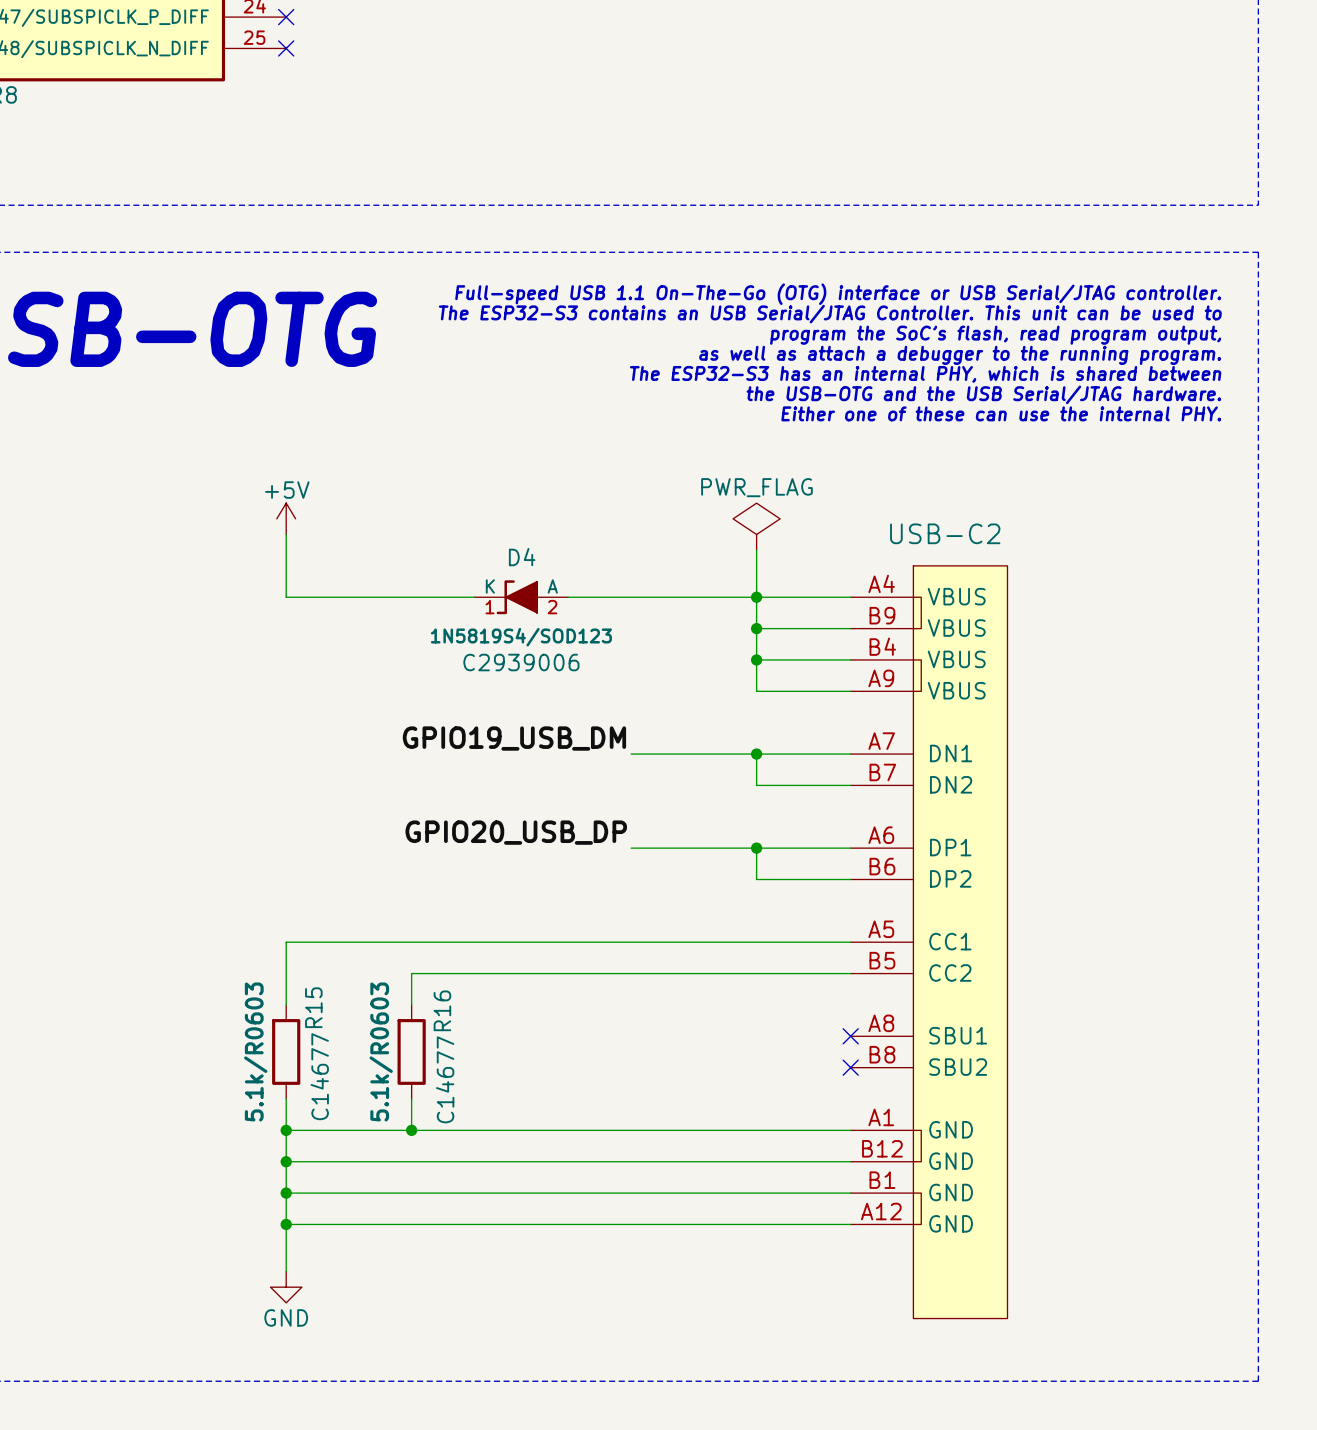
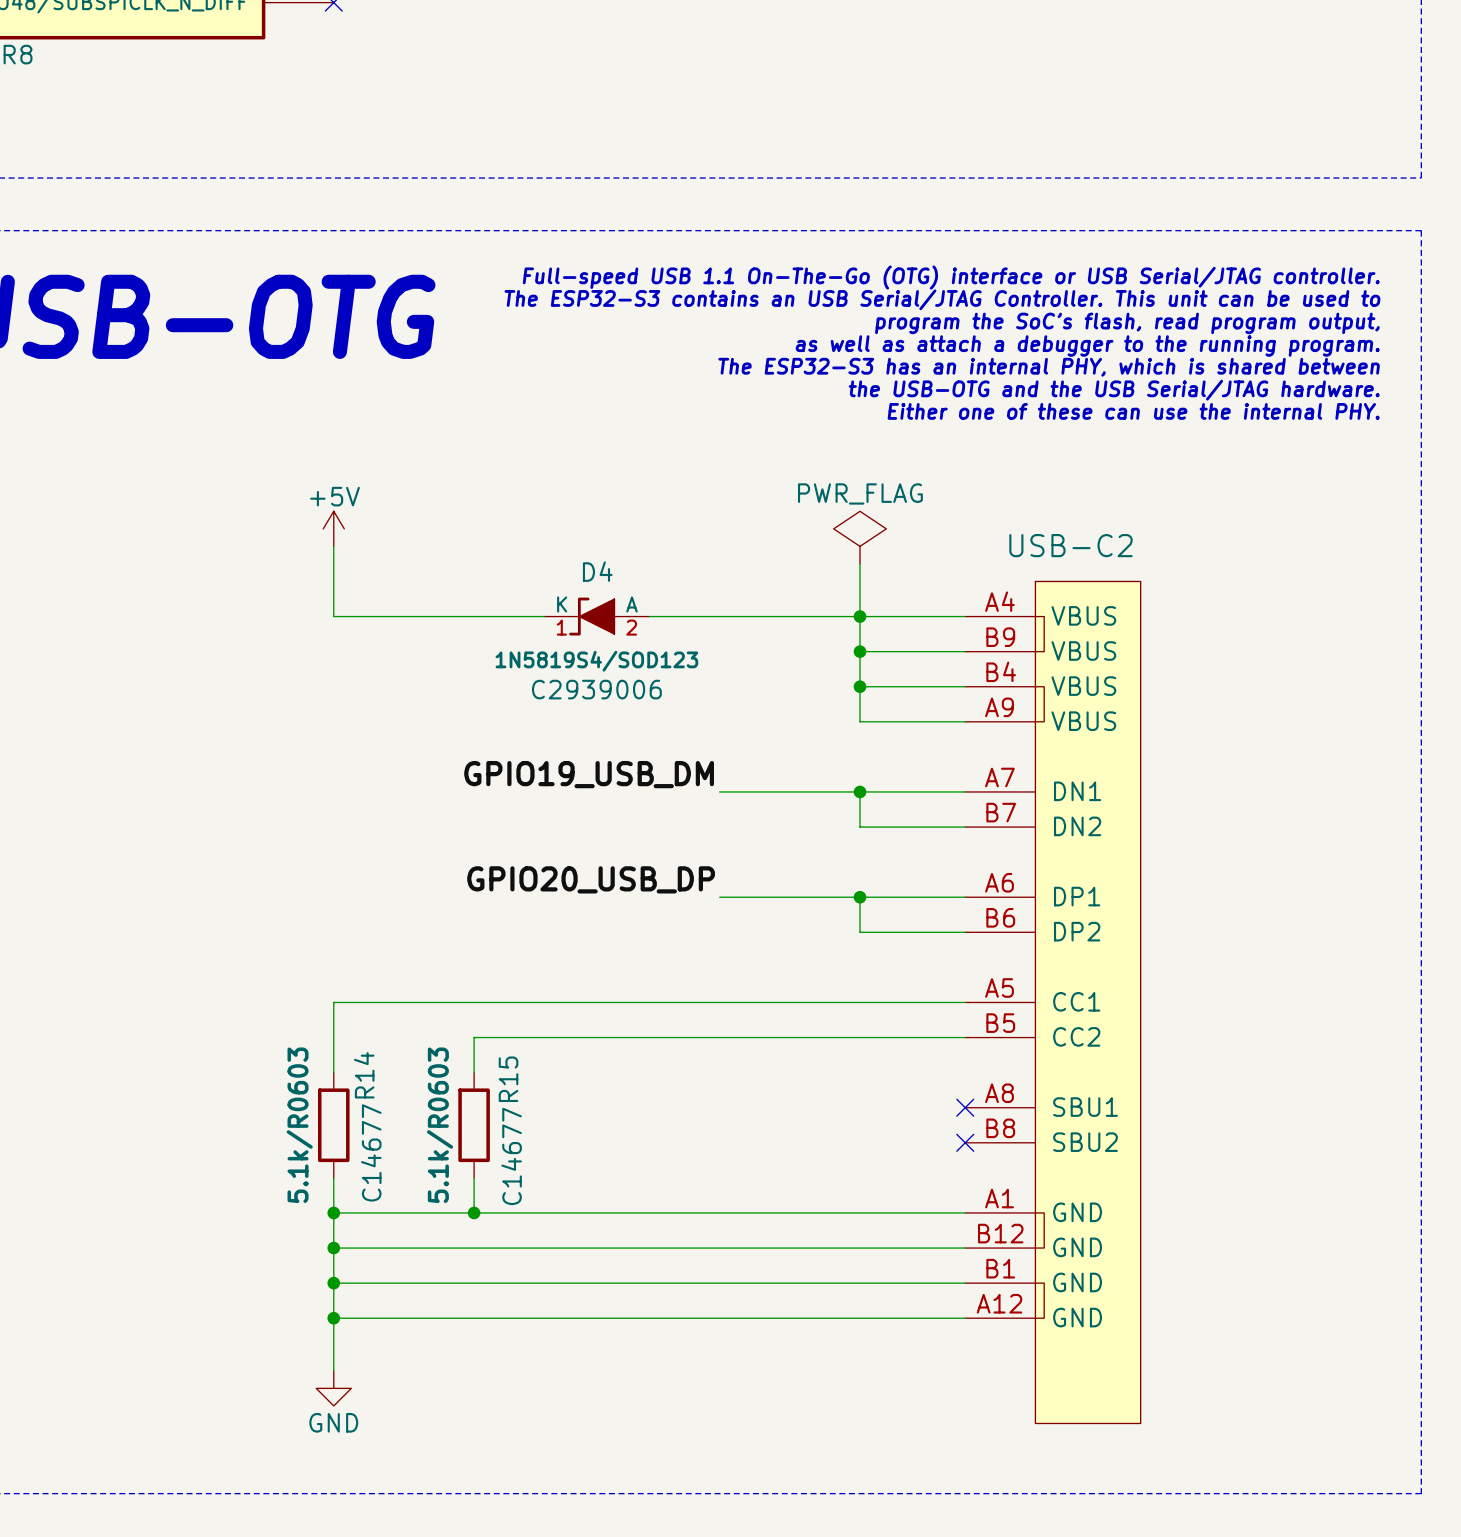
R15 name: R15 (313, 1007) -> R14 (364, 1075)
R16 name: R16 (442, 1010) -> R15 (508, 1079)

